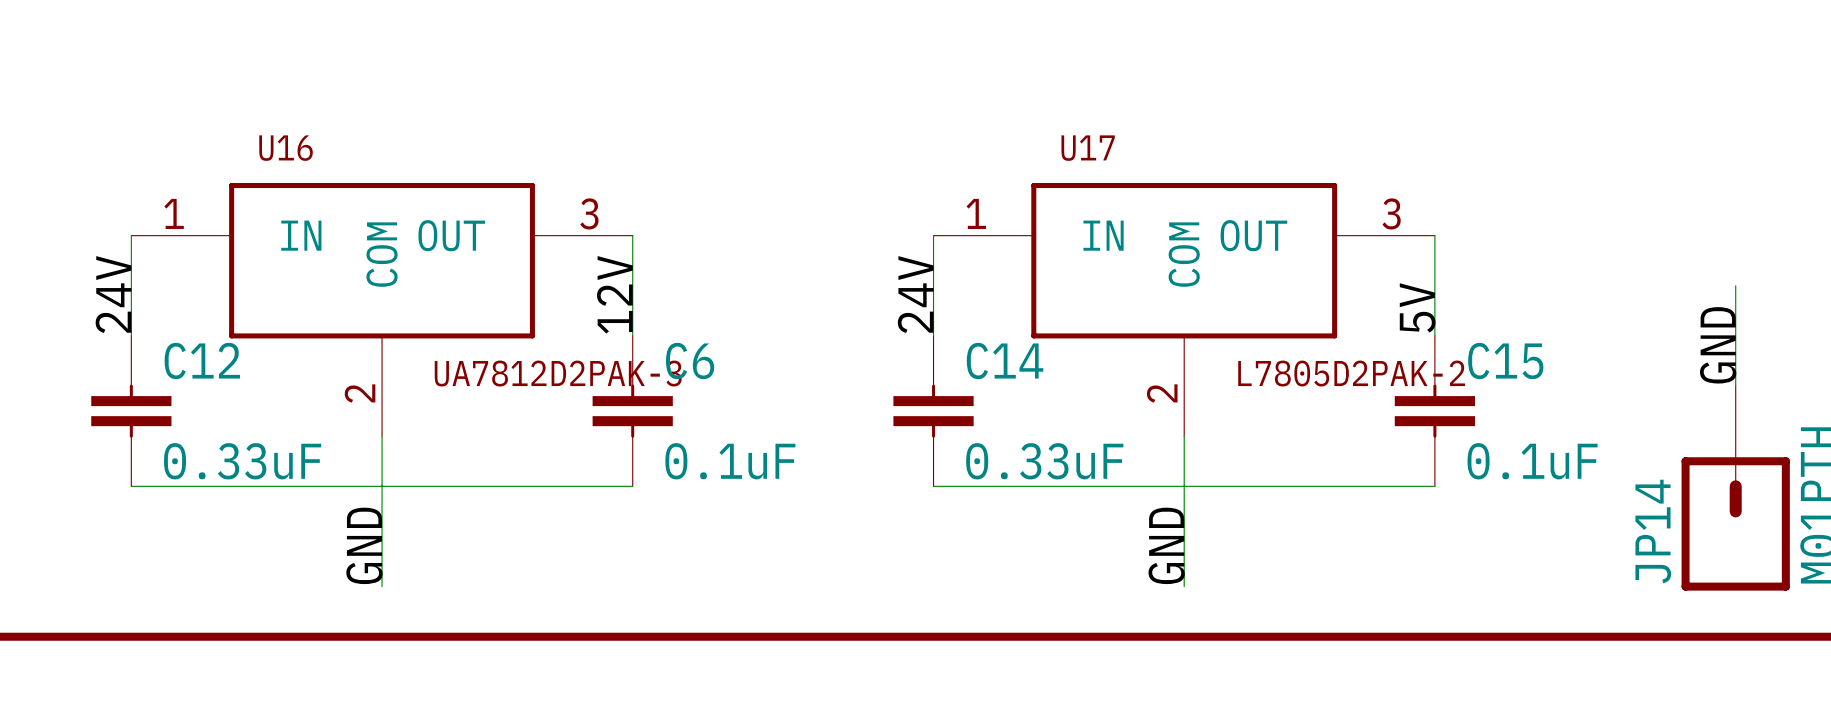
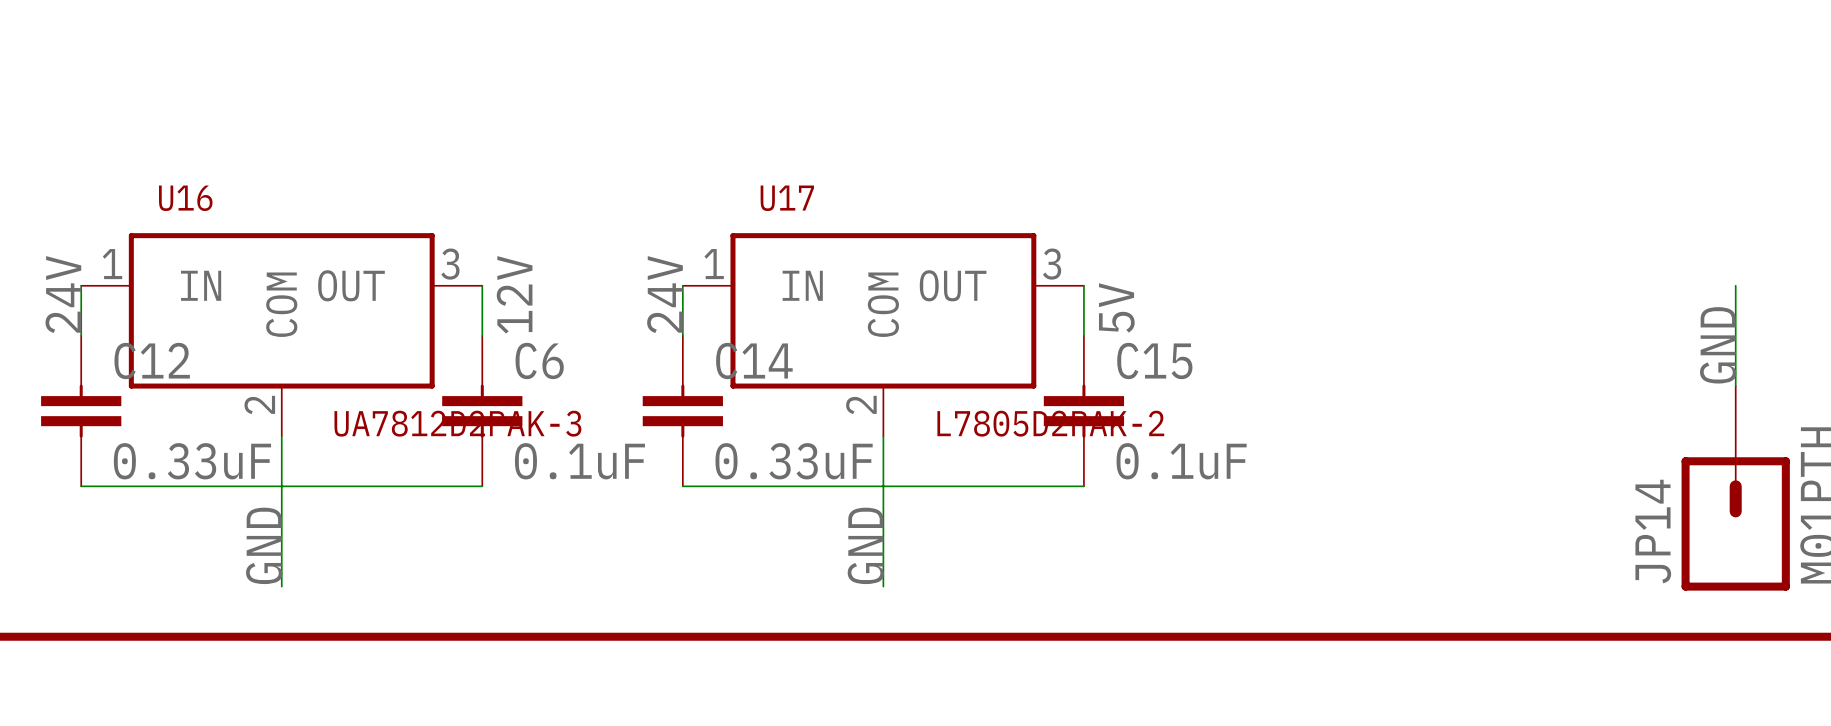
U16 symbol: [131, 183, 633, 437] -> [81, 233, 483, 437]
U17 symbol: [933, 183, 1435, 437] -> [682, 233, 1084, 437]
wire: (632, 235) (632, 335) -> none
wire: (933, 235) (933, 335) -> none
wire: (1434, 235) (1434, 335) -> none
wire: none -> (81, 285) (81, 335)
wire: none -> (482, 285) (482, 335)
wire: none -> (682, 285) (682, 335)
wire: none -> (1083, 285) (1083, 335)
label position: 24V (113, 294) -> 24V (63, 294)
label position: 12V (614, 294) -> 12V (514, 294)
label position: 24V (915, 294) -> 24V (664, 294)
label position: 5V (1417, 307) -> 5V (1116, 307)
C12 position: (131, 411) -> (81, 411)
C6 position: (632, 411) -> (482, 411)
C14 position: (933, 411) -> (682, 411)
C15 position: (1434, 411) -> (1083, 411)
wire: (382, 436) (382, 586) -> (281, 436) (281, 586)
wire: (1184, 436) (1184, 586) -> (883, 436) (883, 586)
wire: none -> (81, 486) (131, 486)
wire: (482, 486) (632, 486) -> none
wire: none -> (682, 486) (933, 486)
wire: (1083, 486) (1434, 486) -> none
label position: GND (364, 545) -> GND (264, 545)
label: none -> GND (865, 545)
label: GND (1166, 545) -> none

